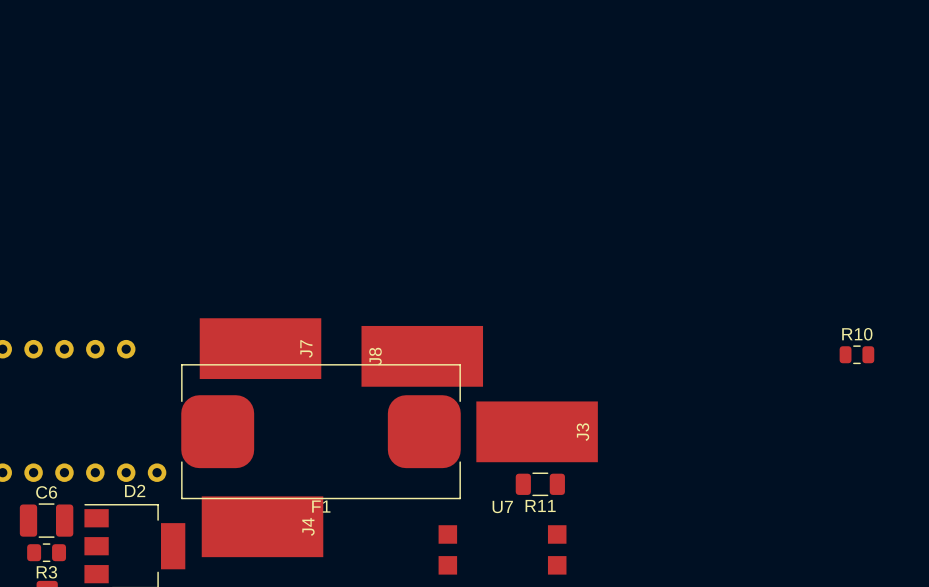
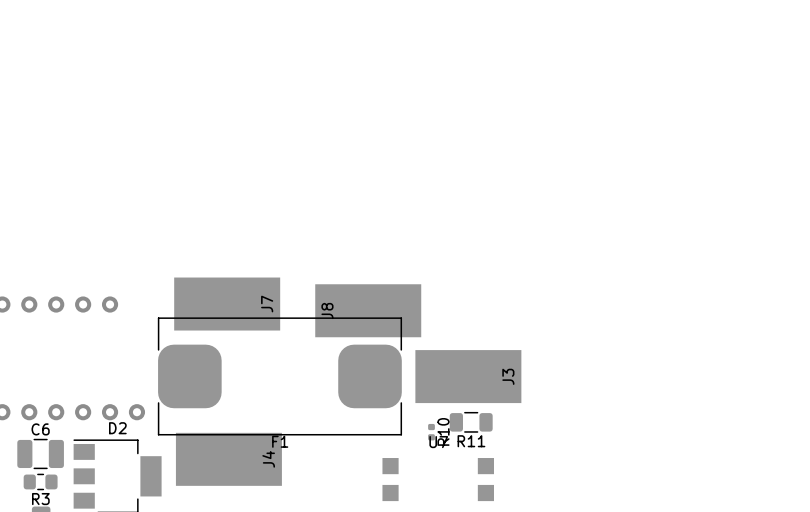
R10 name position: R10 (857, 334) -> R10 (443, 431)
R10 footprint: [839, 345, 875, 365] -> [428, 423, 435, 441]

